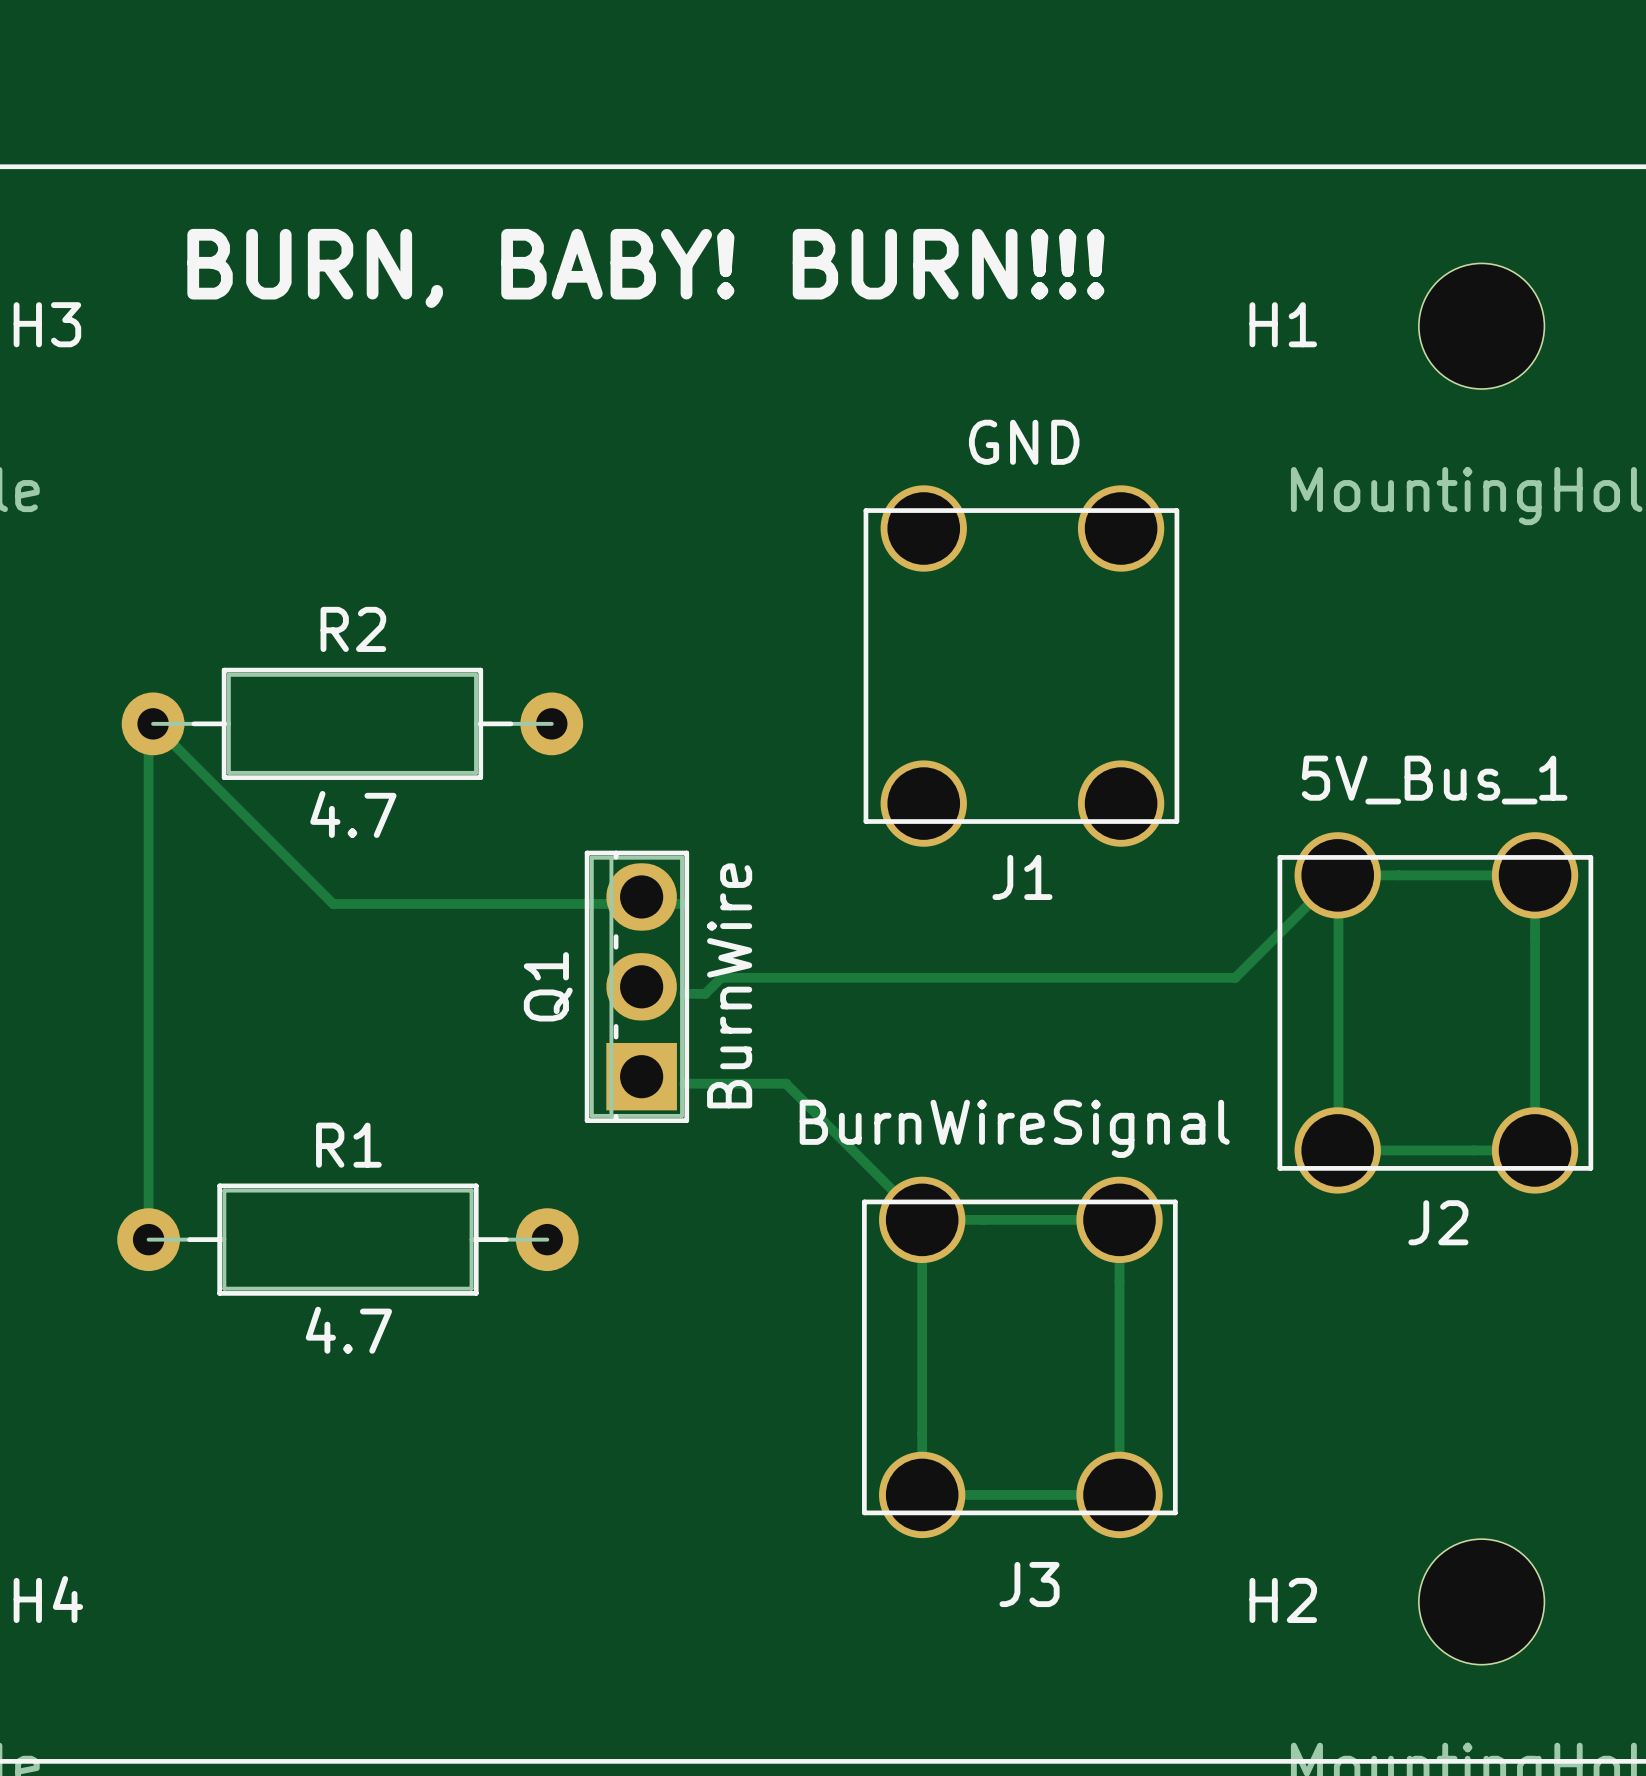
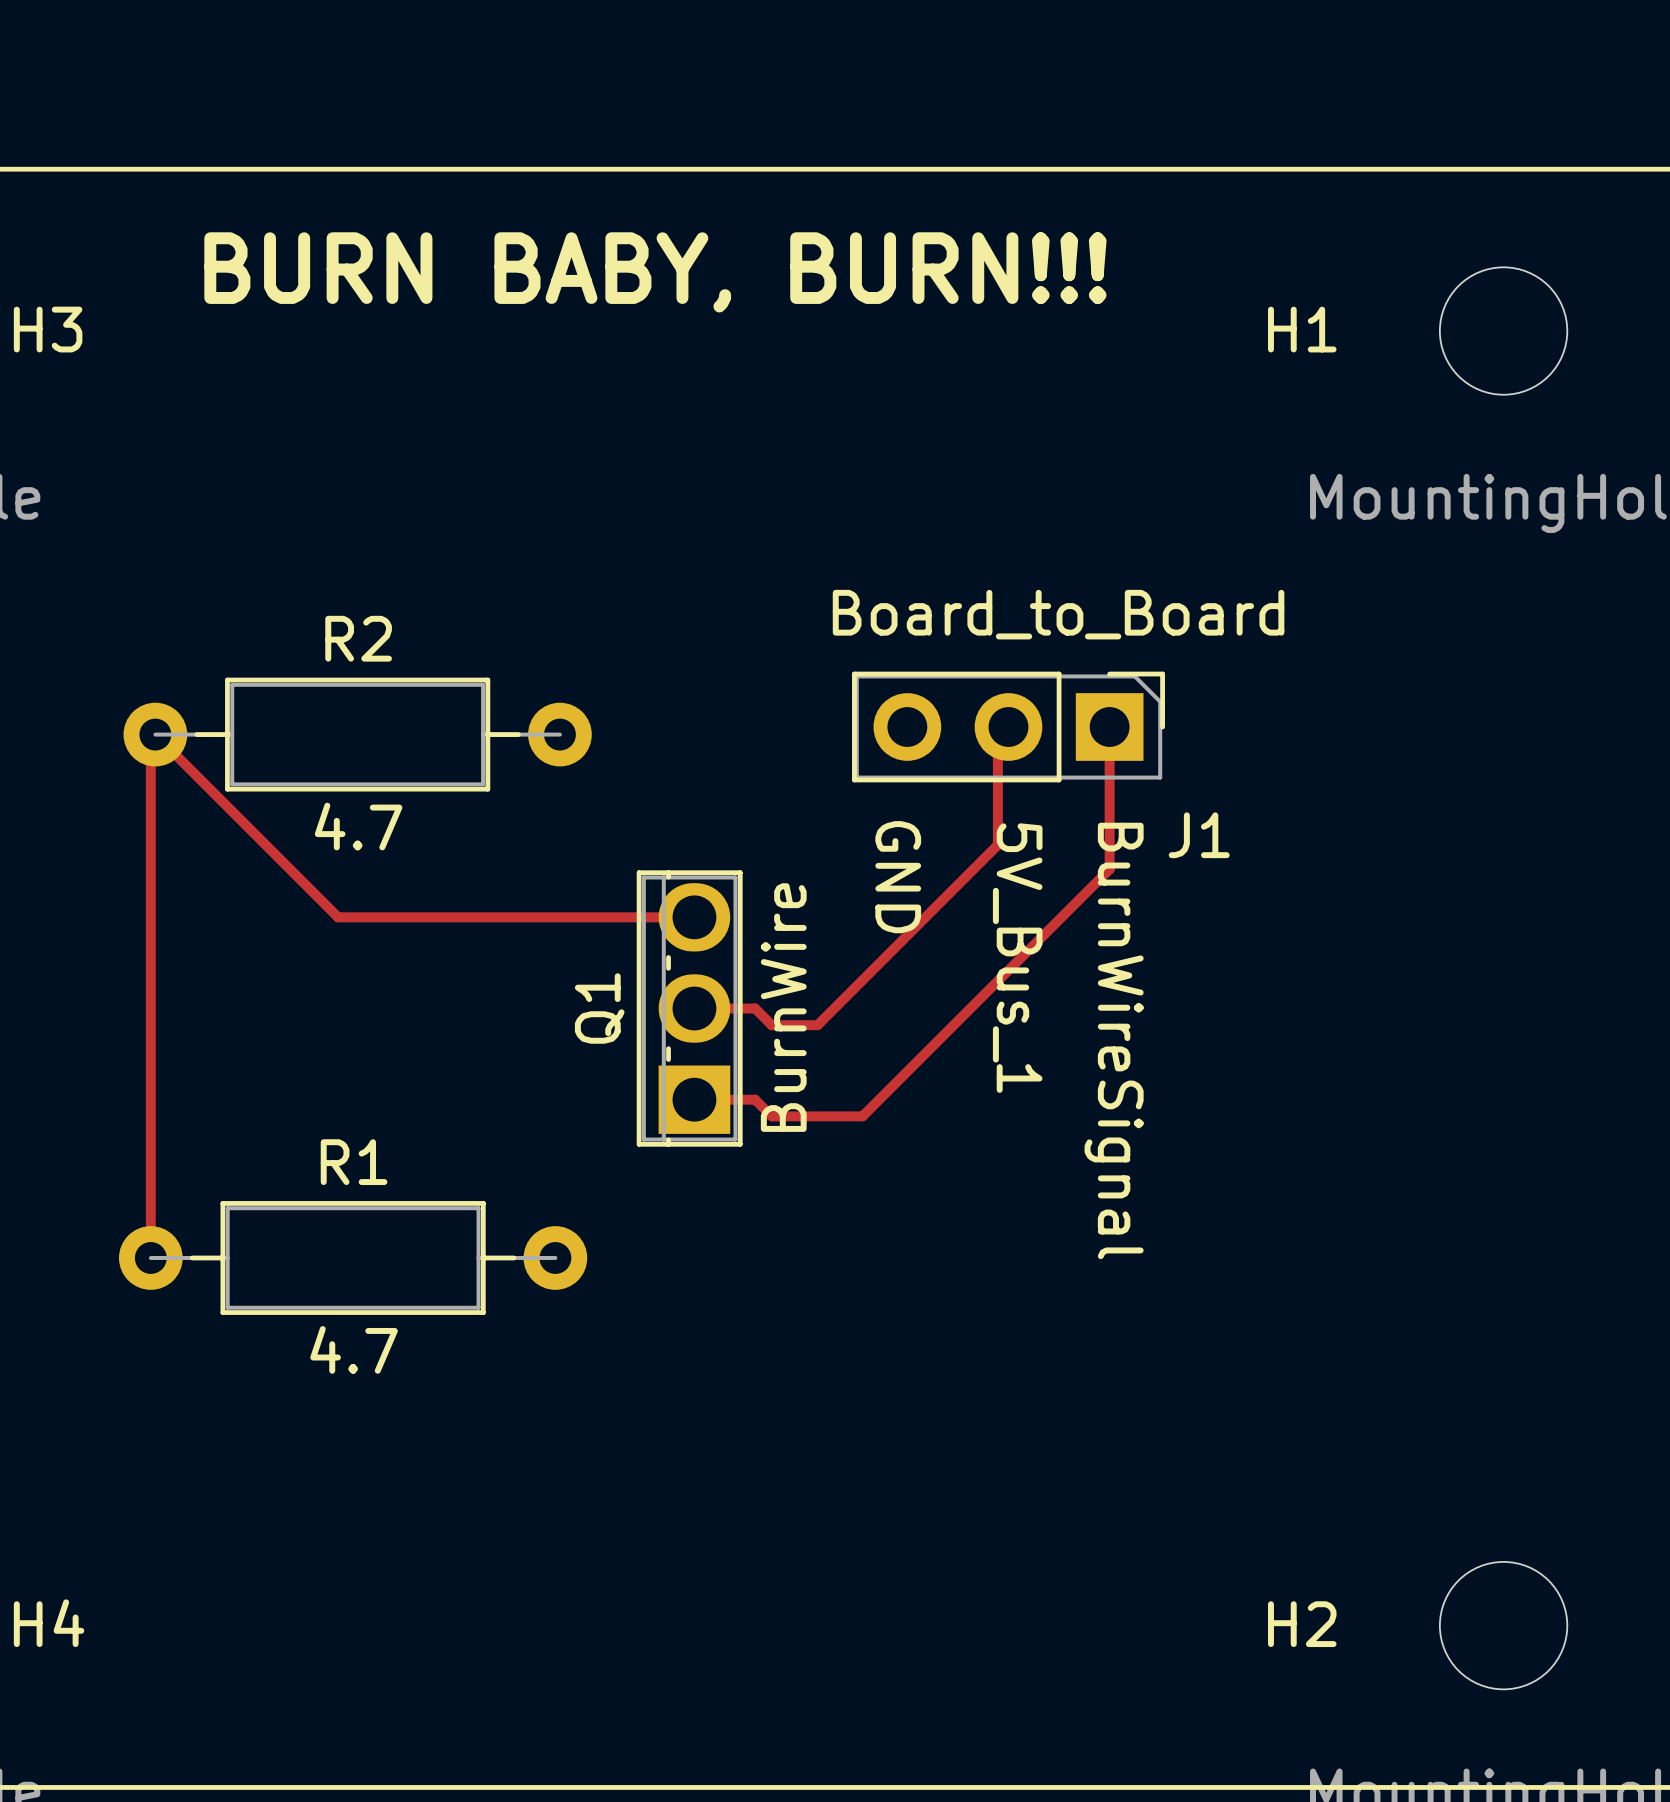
text: BURN, BABY! BURN!!! (645, 268) -> BURN BABY, BURN!!! (655, 272)
J1 value: GND (1024, 442) -> Board_to_Board (1058, 614)
J1 footprint: [863, 485, 1180, 847] -> [852, 671, 1165, 783]
text: none -> GND (898, 877)
track: (1337, 875) (1235, 977) (721, 977) (705, 993) -> (1018, 727) (997, 747) (997, 844) (817, 1025) (771, 1025) (755, 1008) (715, 1008)
track: (1337, 875) (1535, 875) (1535, 1150) (1337, 1150) (1337, 875) -> none
J1 name position: J1 (1022, 877) -> J1 (1199, 835)
text: none -> 5V_Bus_1 (1017, 958)
Q1 position: (636, 986) -> (689, 1008)
J2: 5V_Bus_1 (1435, 1012) -> none
text: none -> BurnWireSignal (1114, 1040)
track: (744, 1083) (785, 1083) (922, 1219) -> (755, 1099) (771, 1116) (862, 1116) (1109, 869) (1109, 727)
track: (922, 1219) (1119, 1219) (1119, 1494) (922, 1494) (922, 1219) -> none
J3: BurnWireSignal (1019, 1357) -> none

